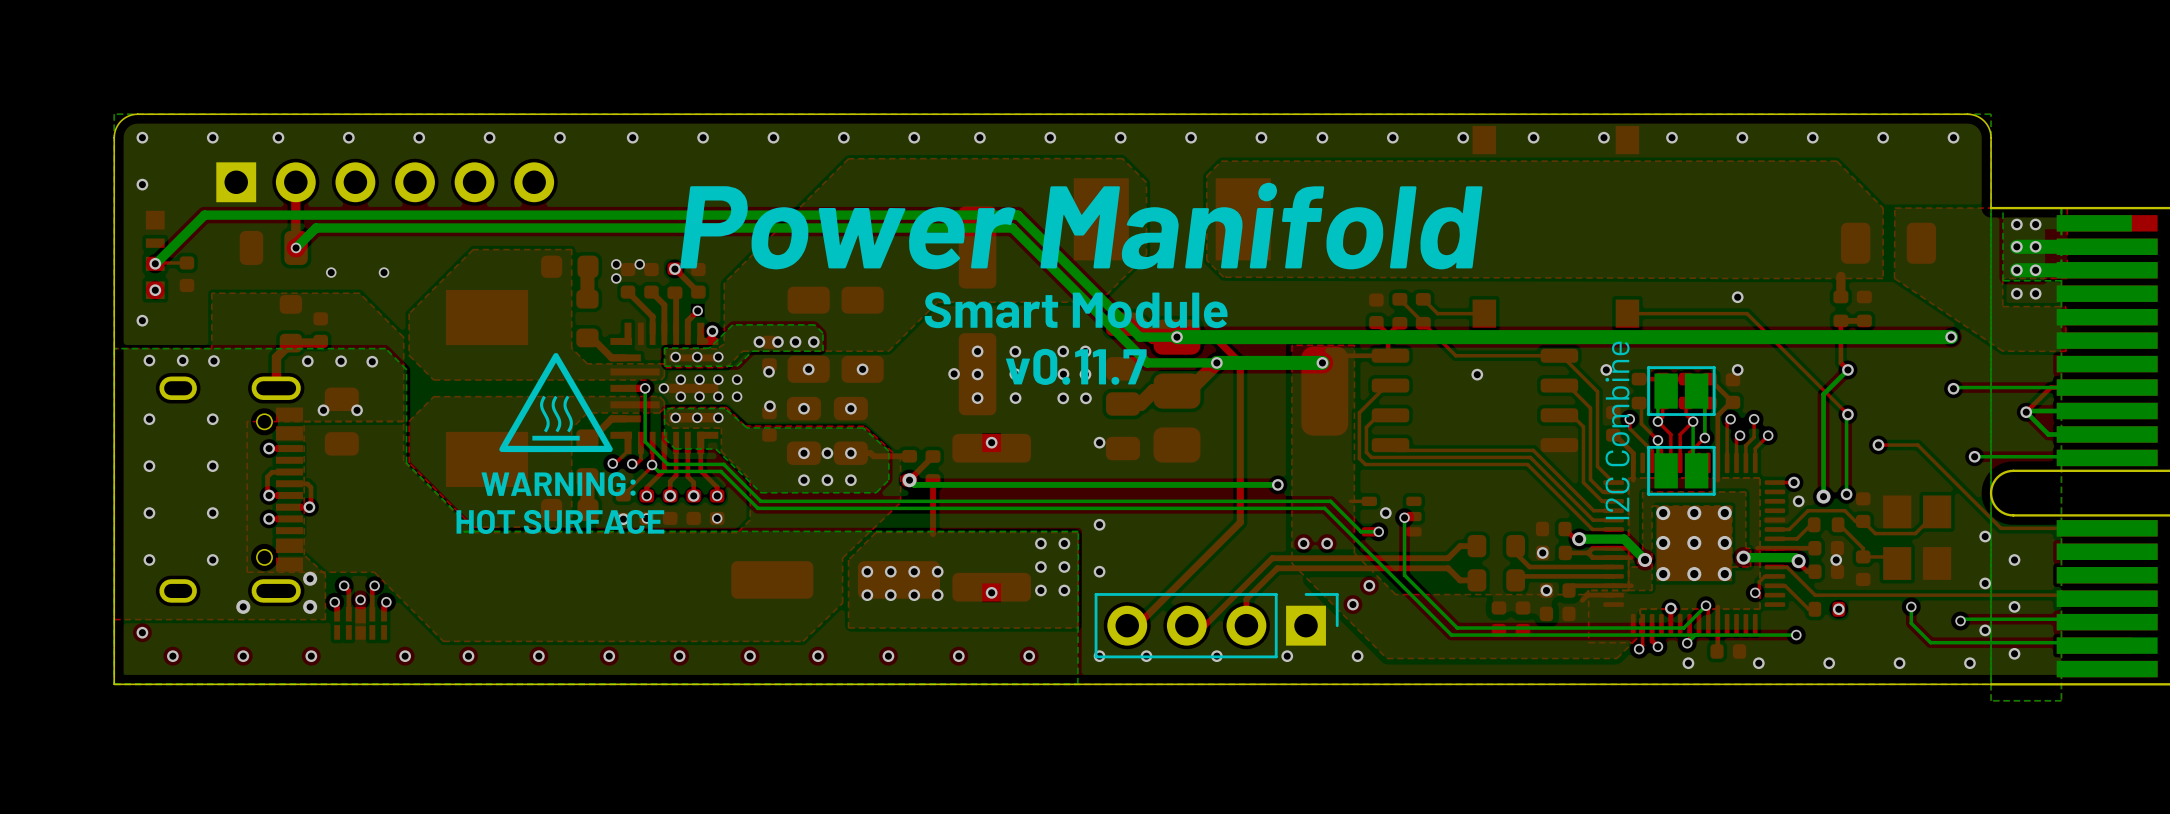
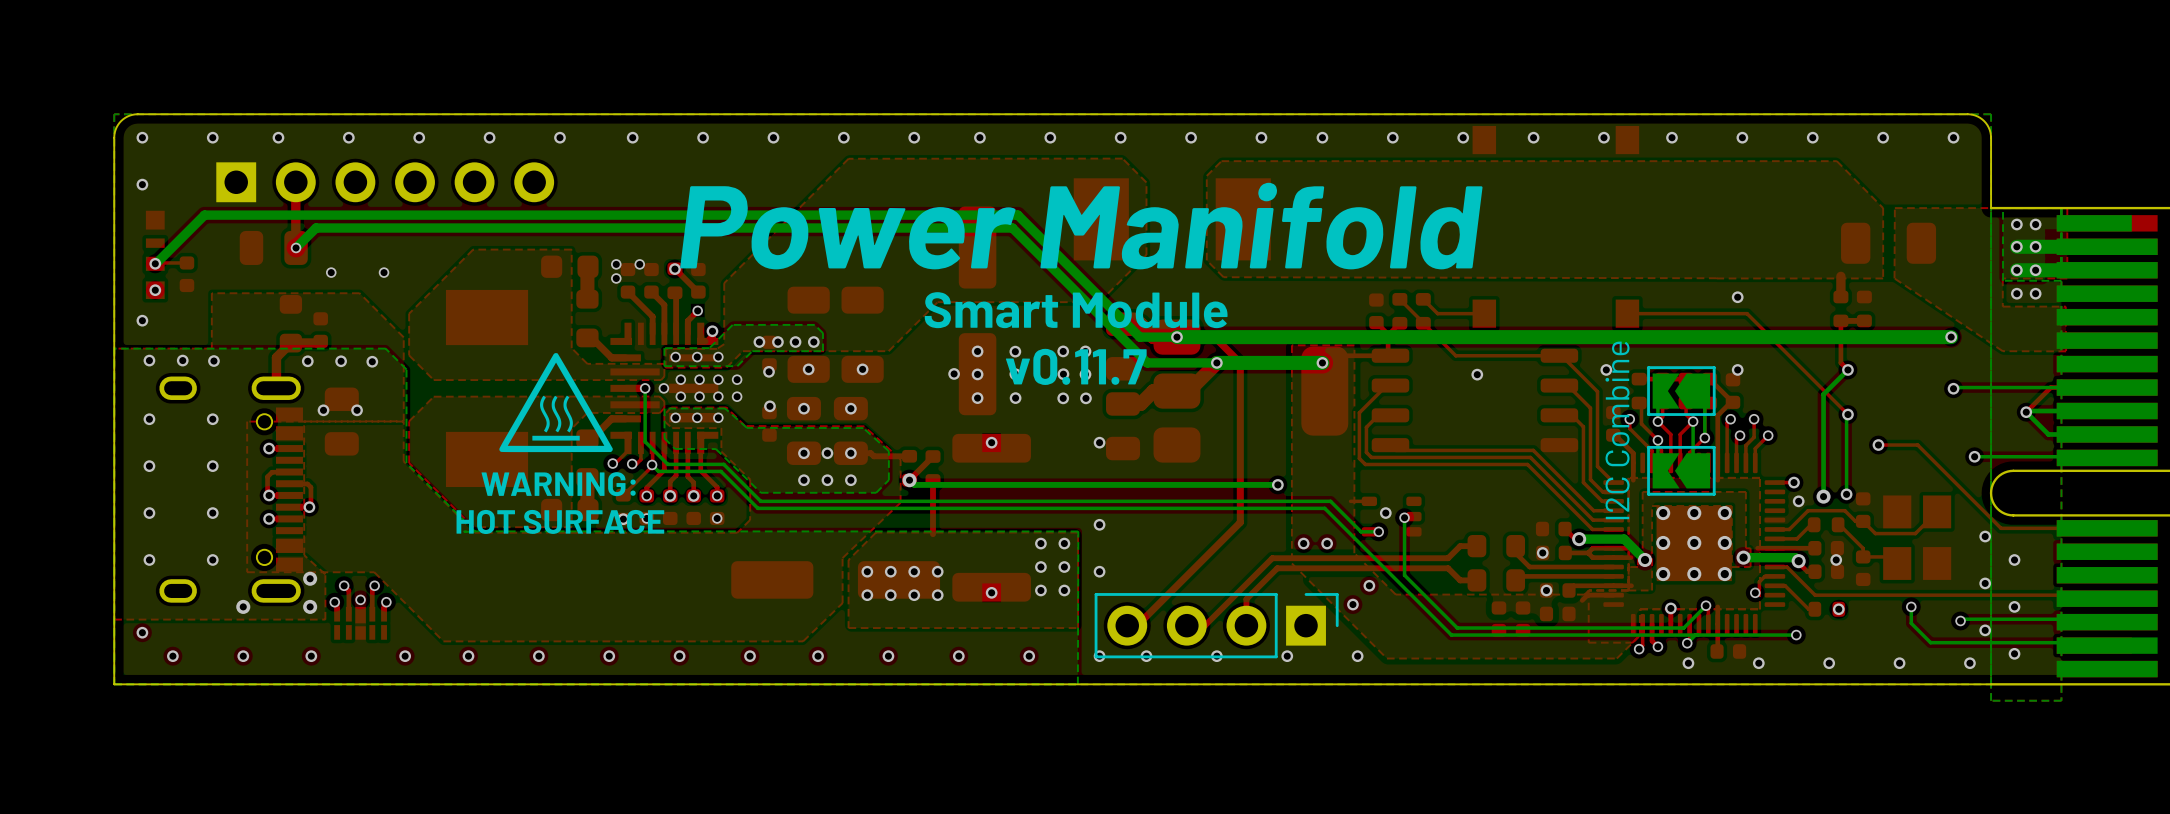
part footprint: [1647, 366, 1716, 416] -> [1647, 366, 1716, 416]
part footprint: [1647, 445, 1716, 496] -> [1647, 445, 1716, 496]

